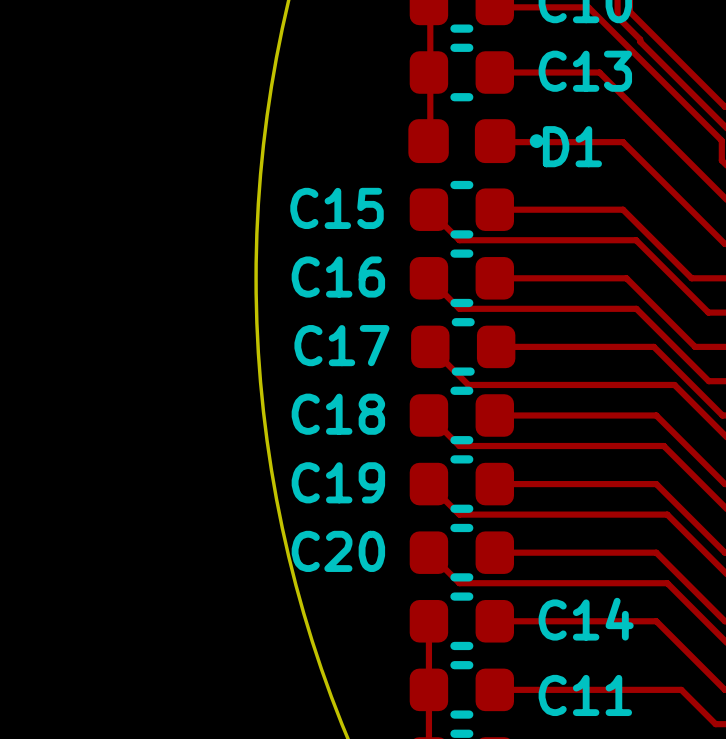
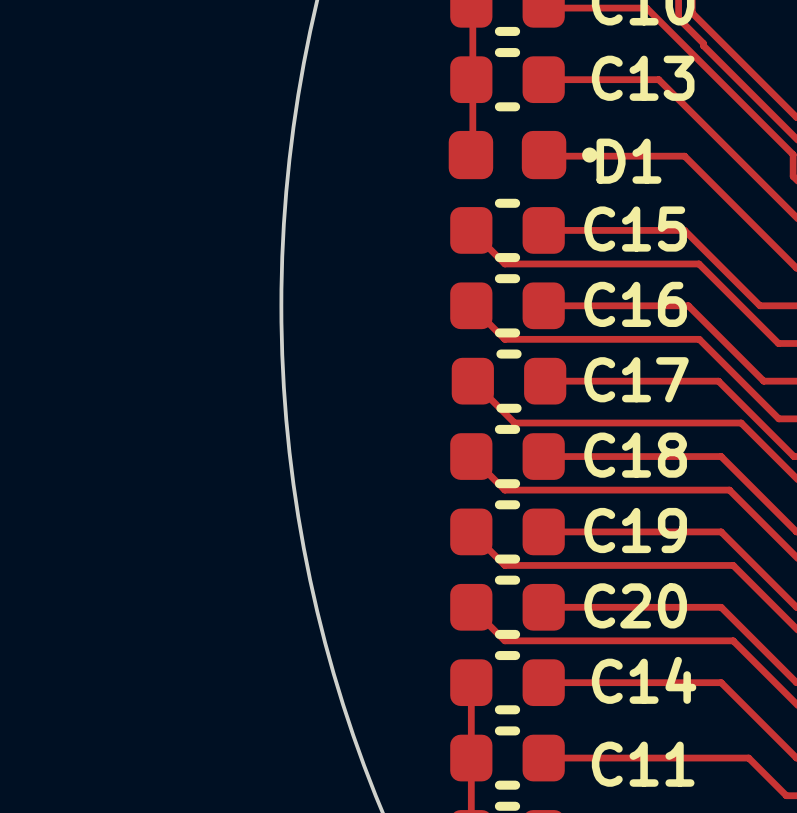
C15 name position: C15 (337, 208) -> C15 (635, 229)
C16 name position: C16 (338, 277) -> C16 (635, 304)
C17 name position: C17 (341, 345) -> C17 (636, 379)
C18 name position: C18 (338, 414) -> C18 (635, 455)
C19 name position: C19 (338, 482) -> C19 (635, 530)
C20 name position: C20 (338, 551) -> C20 (635, 605)

